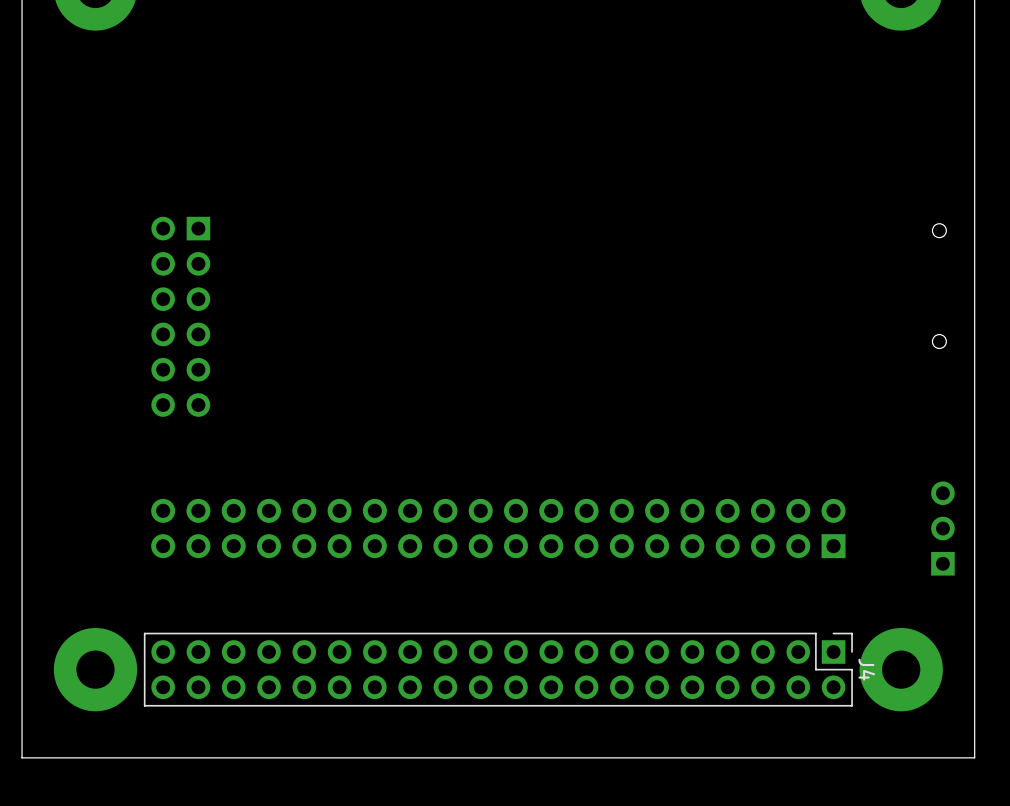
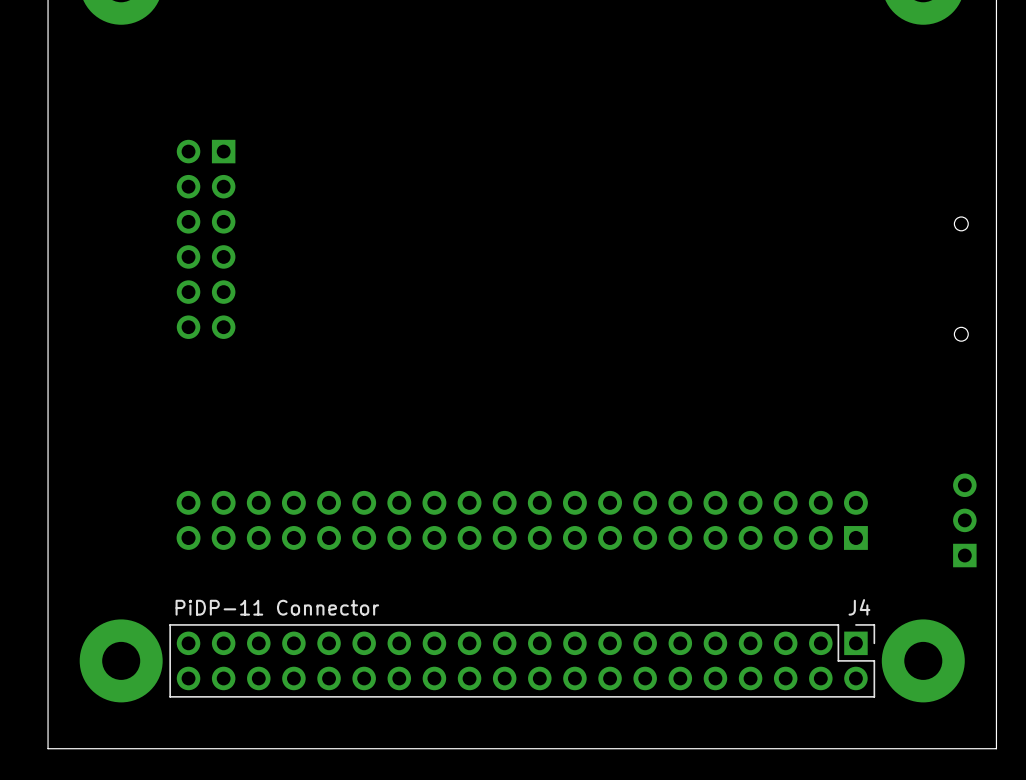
part position: (180, 316) -> (206, 239)
text: none -> PiDP-11 Connector (277, 607)
J4 name rotation: 0° (866, 669) -> 90° counterclockwise (859, 607)
J4 name position: J4 (866, 669) -> J4 (859, 607)

